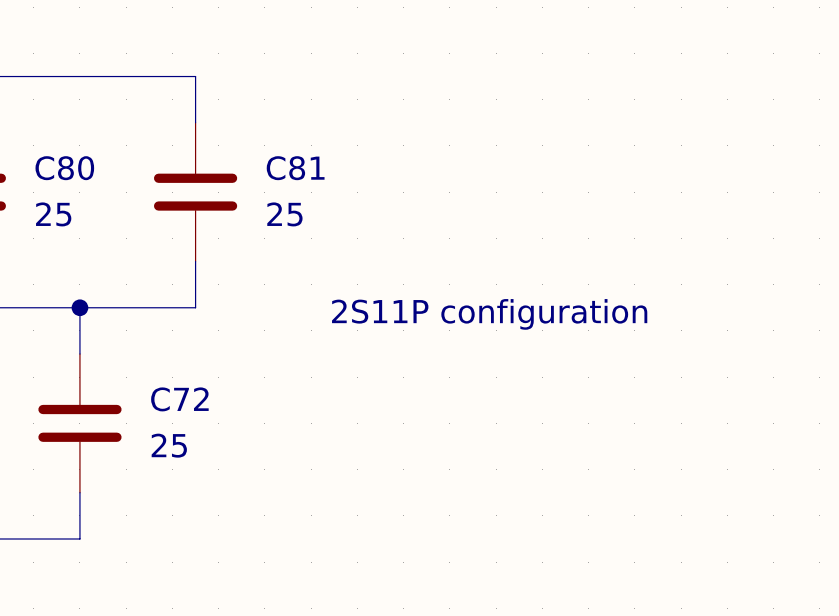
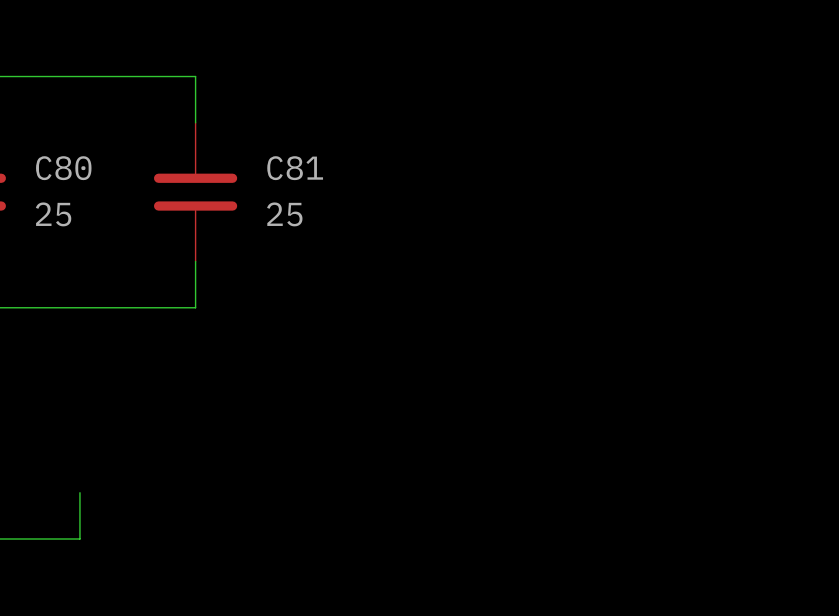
wire: (79, 307) (79, 354) -> none
junction: (79, 307) -> none
text: 2S11P configuration (489, 314) -> none
C72: 25 (79, 423) -> none

